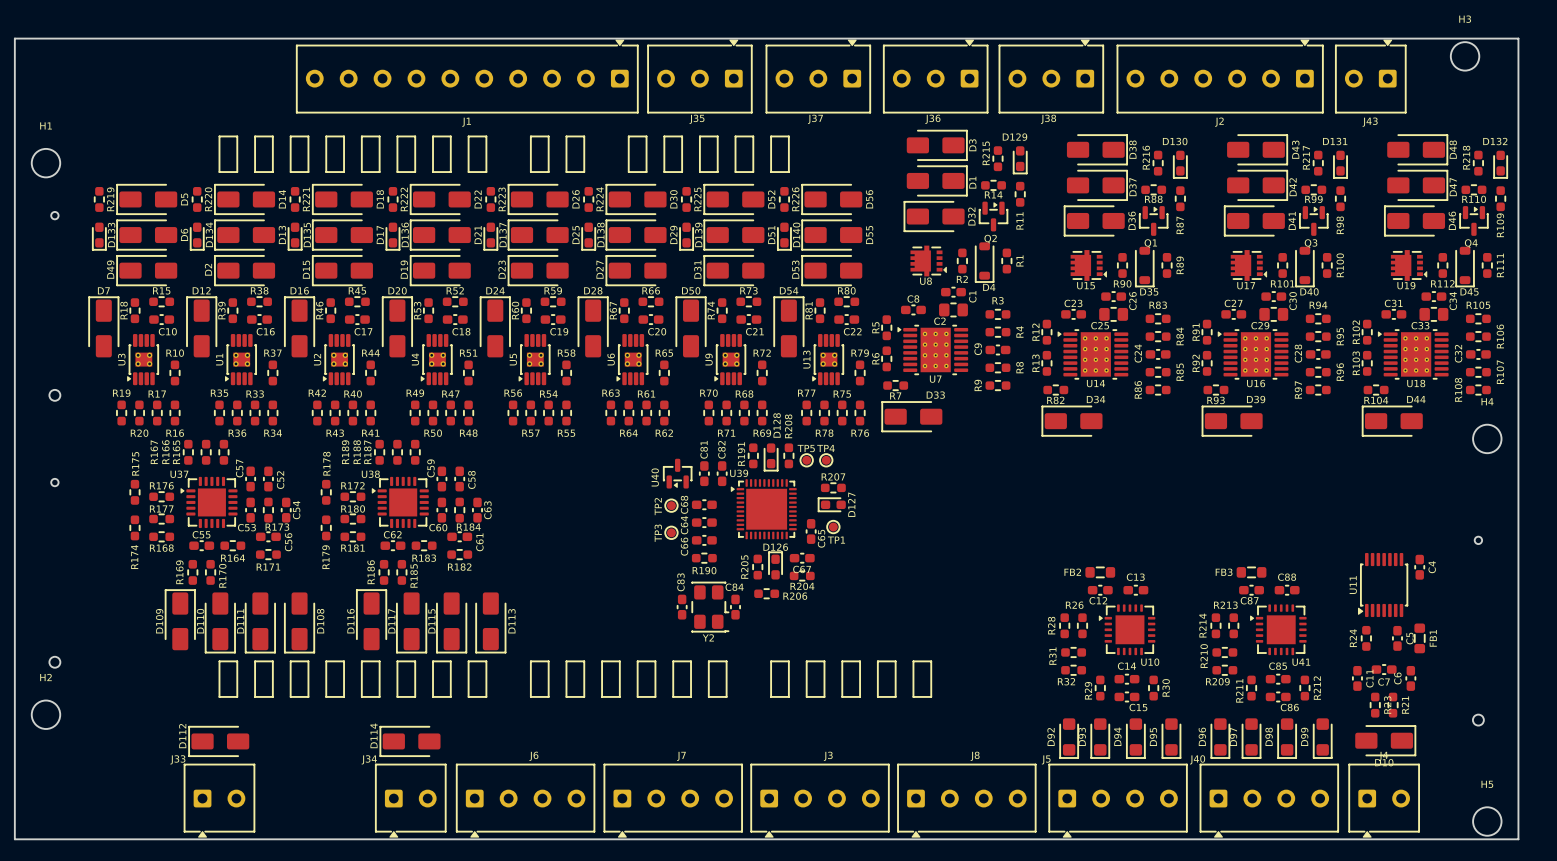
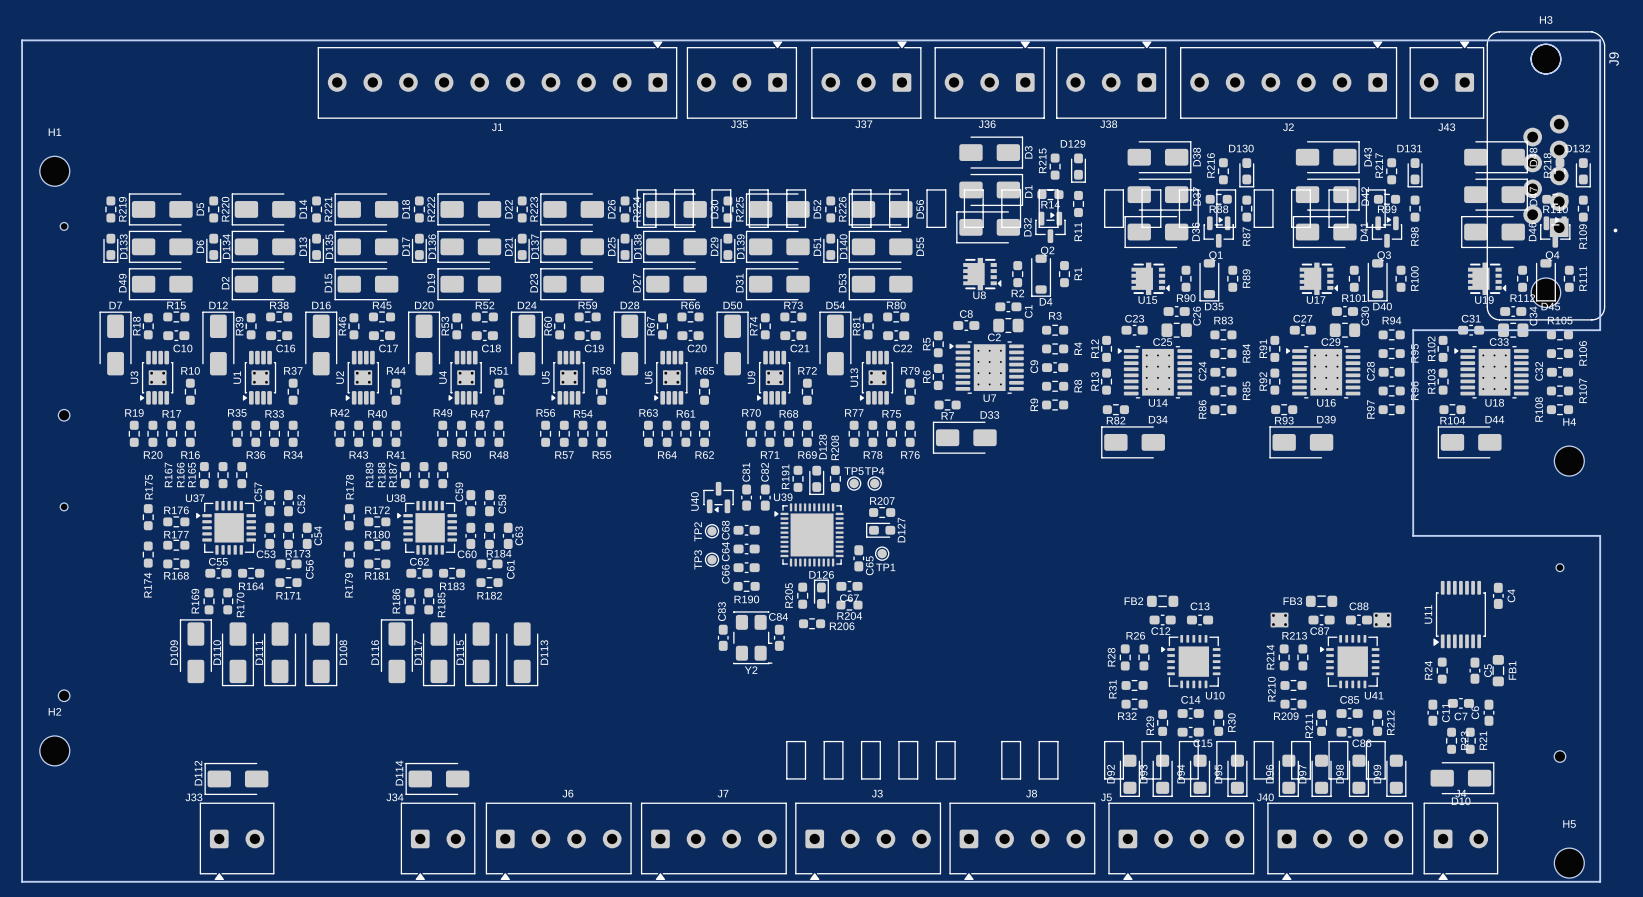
board edge: (1516, 38) (1518, 38) (1518, 839) (1516, 839) -> (1600, 40) (1600, 330) (1413, 330) (1413, 535) (1600, 535) (1600, 881)
line: (219, 136) (237, 136) (237, 172) (219, 172) (219, 136) -> none
line: (255, 136) (272, 136) (272, 172) (255, 172) (255, 136) -> none
line: (290, 136) (308, 136) (308, 172) (290, 172) (290, 136) -> none
line: (326, 136) (344, 136) (344, 172) (326, 172) (326, 136) -> none
line: (361, 136) (379, 136) (379, 172) (361, 172) (361, 136) -> none
line: (397, 136) (415, 136) (415, 172) (397, 172) (397, 136) -> (637, 189) (655, 189) (655, 227) (637, 227) (637, 189)
line: (433, 136) (450, 136) (450, 172) (433, 172) (433, 136) -> (674, 189) (693, 189) (693, 227) (674, 227) (674, 189)
line: (468, 136) (486, 136) (486, 172) (468, 172) (468, 136) -> (712, 189) (730, 189) (730, 227) (712, 227) (712, 189)
line: (530, 136) (548, 136) (548, 172) (530, 172) (530, 136) -> (749, 189) (768, 189) (768, 227) (749, 227) (749, 189)
line: (566, 136) (584, 136) (584, 172) (566, 172) (566, 136) -> (786, 189) (805, 189) (805, 227) (786, 227) (786, 189)
line: (628, 136) (646, 136) (646, 172) (628, 172) (628, 136) -> (852, 189) (870, 189) (870, 227) (852, 227) (852, 189)
line: (664, 136) (682, 136) (682, 172) (664, 172) (664, 136) -> (889, 189) (908, 189) (908, 227) (889, 227) (889, 189)
line: (699, 136) (717, 136) (717, 172) (699, 172) (699, 136) -> (927, 189) (945, 189) (945, 227) (927, 227) (927, 189)
line: (735, 136) (753, 136) (753, 172) (735, 172) (735, 136) -> (964, 189) (983, 189) (983, 227) (964, 227) (964, 189)
line: (771, 136) (788, 136) (788, 172) (771, 172) (771, 136) -> (1001, 189) (1020, 189) (1020, 227) (1001, 227) (1001, 189)
J9: none -> (1552, 175)
line: none -> (1039, 189) (1057, 189) (1057, 227) (1039, 227) (1039, 189)
line: none -> (1104, 189) (1123, 189) (1123, 227) (1104, 227) (1104, 189)
line: none -> (1142, 189) (1160, 189) (1160, 227) (1142, 227) (1142, 189)
line: none -> (1179, 189) (1198, 189) (1198, 227) (1179, 227) (1179, 189)
line: none -> (1216, 189) (1235, 189) (1235, 227) (1216, 227) (1216, 189)
line: none -> (1254, 189) (1272, 189) (1272, 227) (1254, 227) (1254, 189)
line: none -> (1291, 189) (1310, 189) (1310, 227) (1291, 227) (1291, 189)
line: none -> (1329, 189) (1347, 189) (1347, 227) (1329, 227) (1329, 189)
line: none -> (1366, 189) (1385, 189) (1385, 227) (1366, 227) (1366, 189)
part: none -> (1279, 620)
part: none -> (1382, 620)
line: (219, 661) (219, 696) (237, 696) (237, 661) (219, 661) -> none
line: (255, 661) (272, 661) (272, 696) (255, 696) (255, 661) -> none
line: (290, 661) (308, 661) (308, 696) (290, 696) (290, 661) -> none
line: (326, 661) (344, 661) (344, 696) (326, 696) (326, 661) -> none
line: (361, 661) (379, 661) (379, 696) (361, 696) (361, 661) -> none
line: (397, 661) (415, 661) (415, 696) (397, 696) (397, 661) -> none
line: (433, 661) (450, 661) (450, 696) (433, 696) (433, 661) -> none
line: (468, 661) (486, 661) (486, 696) (468, 696) (468, 661) -> none
line: (530, 661) (548, 661) (548, 696) (530, 696) (530, 661) -> none
line: (566, 661) (584, 661) (584, 696) (566, 696) (566, 661) -> (786, 741) (805, 741) (805, 778) (786, 778) (786, 741)
line: (602, 661) (619, 661) (619, 696) (602, 696) (602, 661) -> (824, 741) (842, 741) (842, 778) (824, 778) (824, 741)
line: (637, 661) (655, 661) (655, 696) (637, 696) (637, 661) -> (861, 741) (880, 741) (880, 778) (861, 778) (861, 741)
line: (673, 661) (691, 661) (691, 696) (673, 696) (673, 661) -> (898, 741) (917, 741) (917, 778) (898, 778) (898, 741)
line: (708, 661) (726, 661) (726, 696) (708, 696) (708, 661) -> (936, 741) (955, 741) (955, 778) (936, 778) (936, 741)
line: (771, 661) (788, 661) (788, 696) (771, 696) (771, 661) -> (1001, 741) (1020, 741) (1020, 778) (1001, 778) (1001, 741)
line: (806, 661) (824, 661) (824, 696) (806, 696) (806, 661) -> (1039, 741) (1057, 741) (1057, 778) (1039, 778) (1039, 741)
line: (842, 661) (860, 661) (860, 696) (842, 696) (842, 661) -> (1104, 741) (1123, 741) (1123, 778) (1104, 778) (1104, 741)
line: (877, 661) (895, 661) (895, 696) (877, 696) (877, 661) -> (1142, 741) (1160, 741) (1160, 778) (1142, 778) (1142, 741)
line: (913, 661) (931, 661) (931, 696) (913, 696) (913, 661) -> (1179, 741) (1198, 741) (1198, 778) (1179, 778) (1179, 741)
line: none -> (1216, 741) (1235, 741) (1235, 778) (1216, 778) (1216, 741)
line: none -> (1254, 741) (1272, 741) (1272, 778) (1254, 778) (1254, 741)
line: none -> (1291, 741) (1310, 741) (1310, 778) (1291, 778) (1291, 741)
line: none -> (1329, 741) (1347, 741) (1347, 778) (1329, 778) (1329, 741)
line: none -> (1366, 741) (1385, 741) (1385, 778) (1366, 778) (1366, 741)

